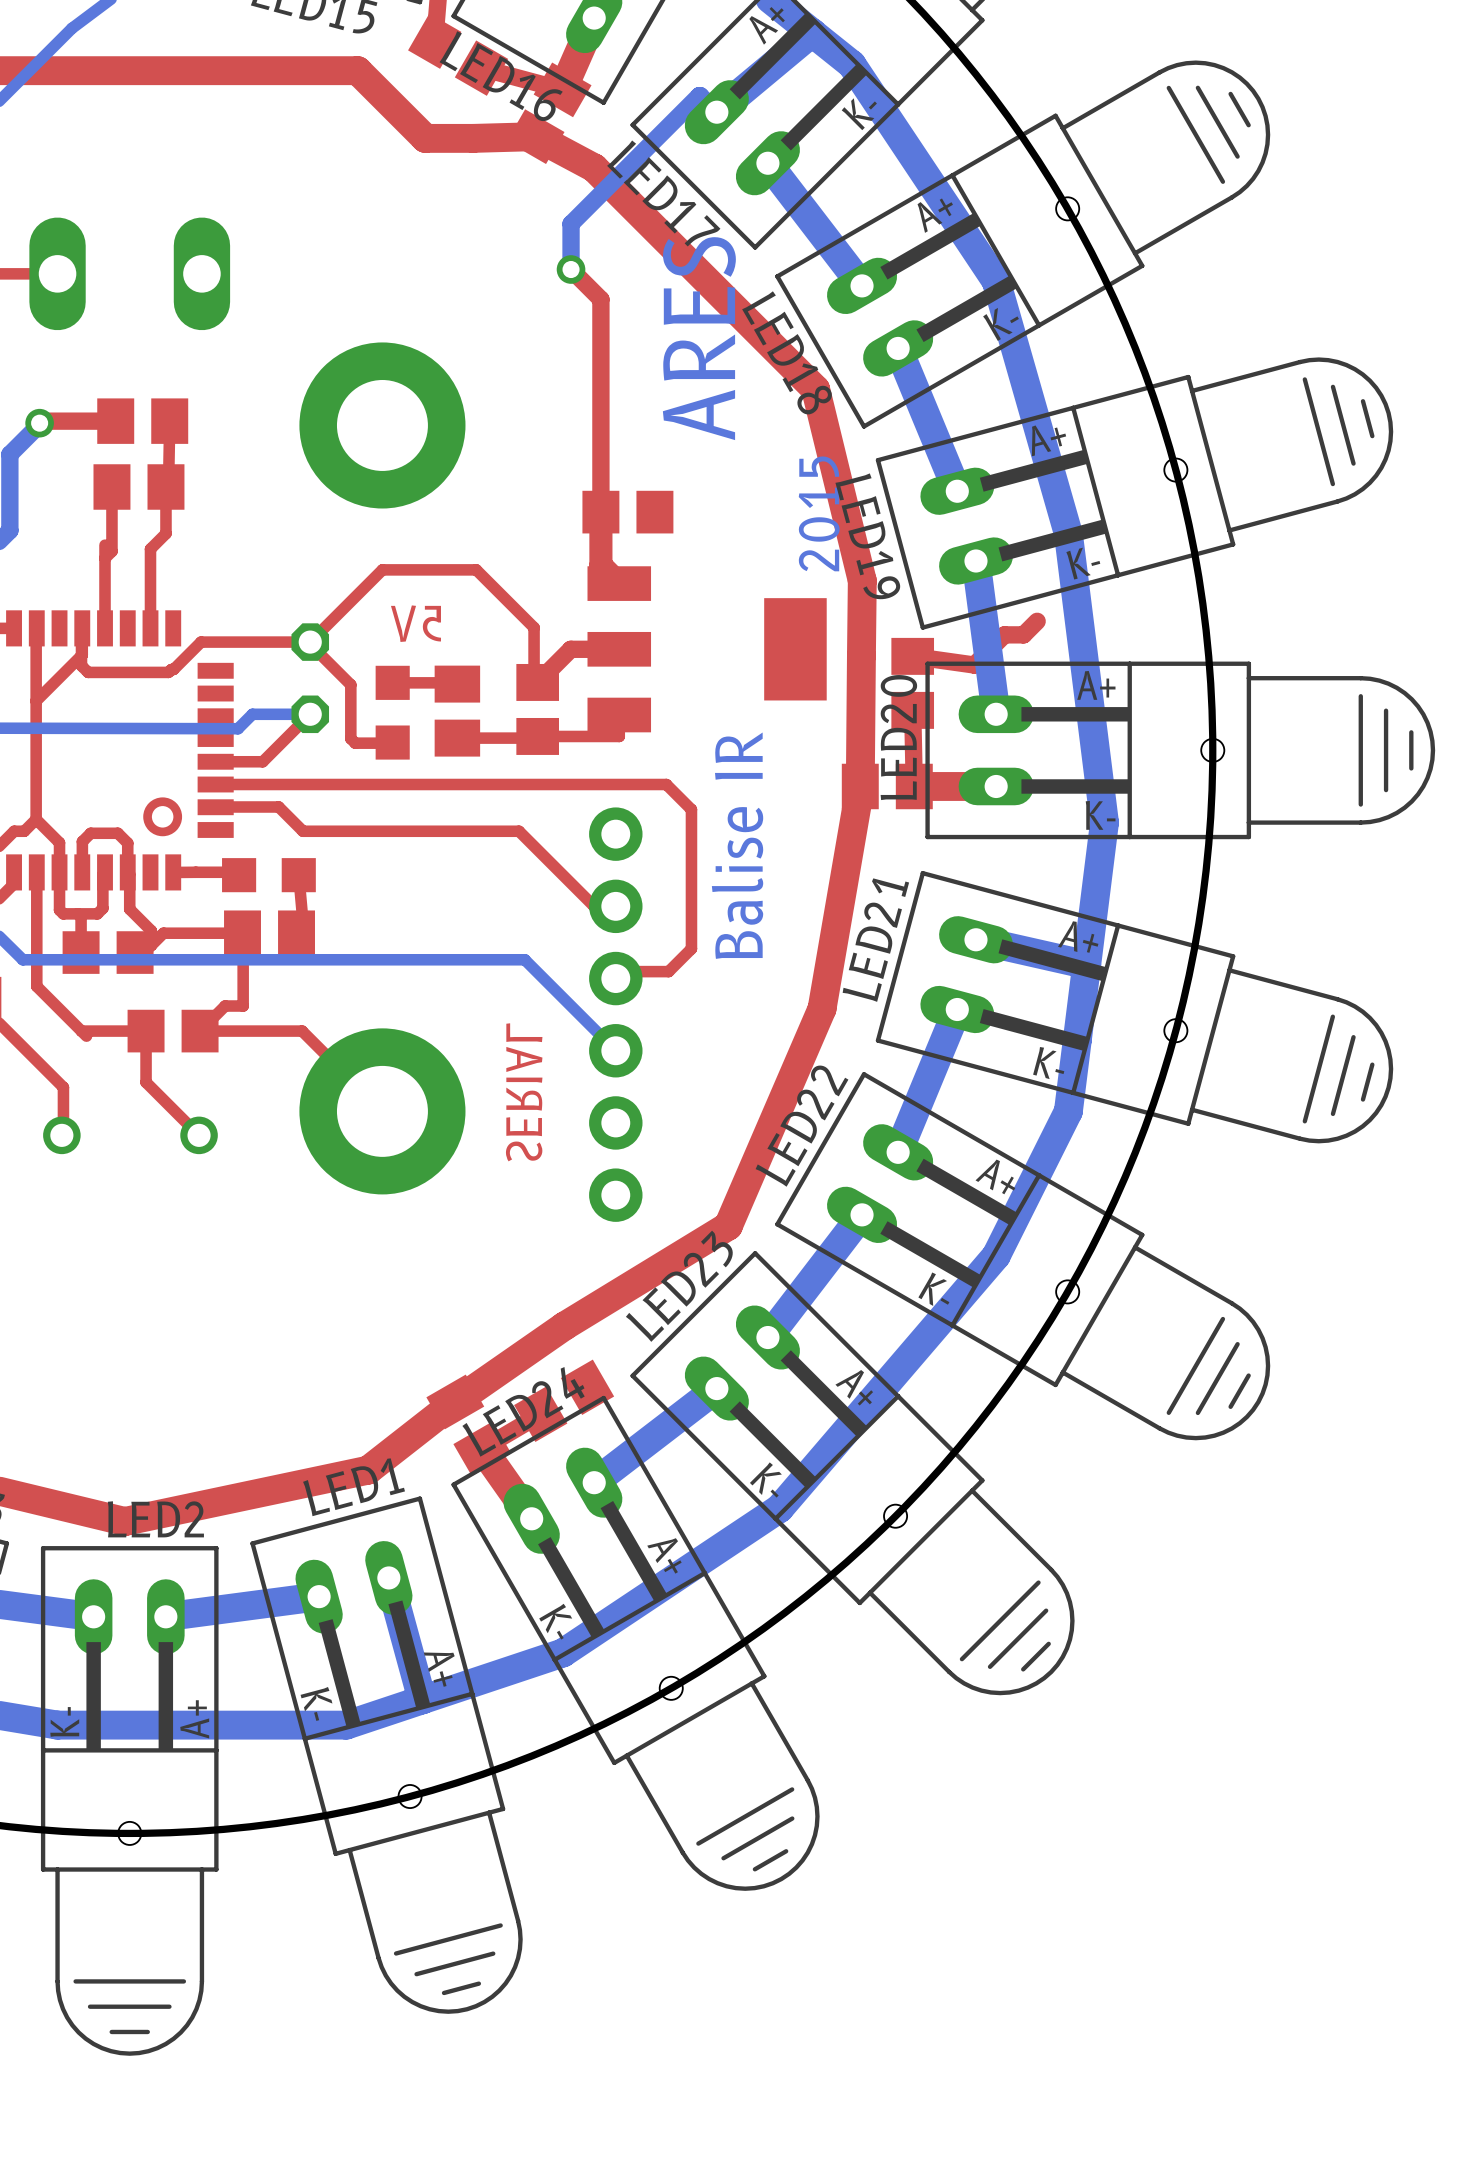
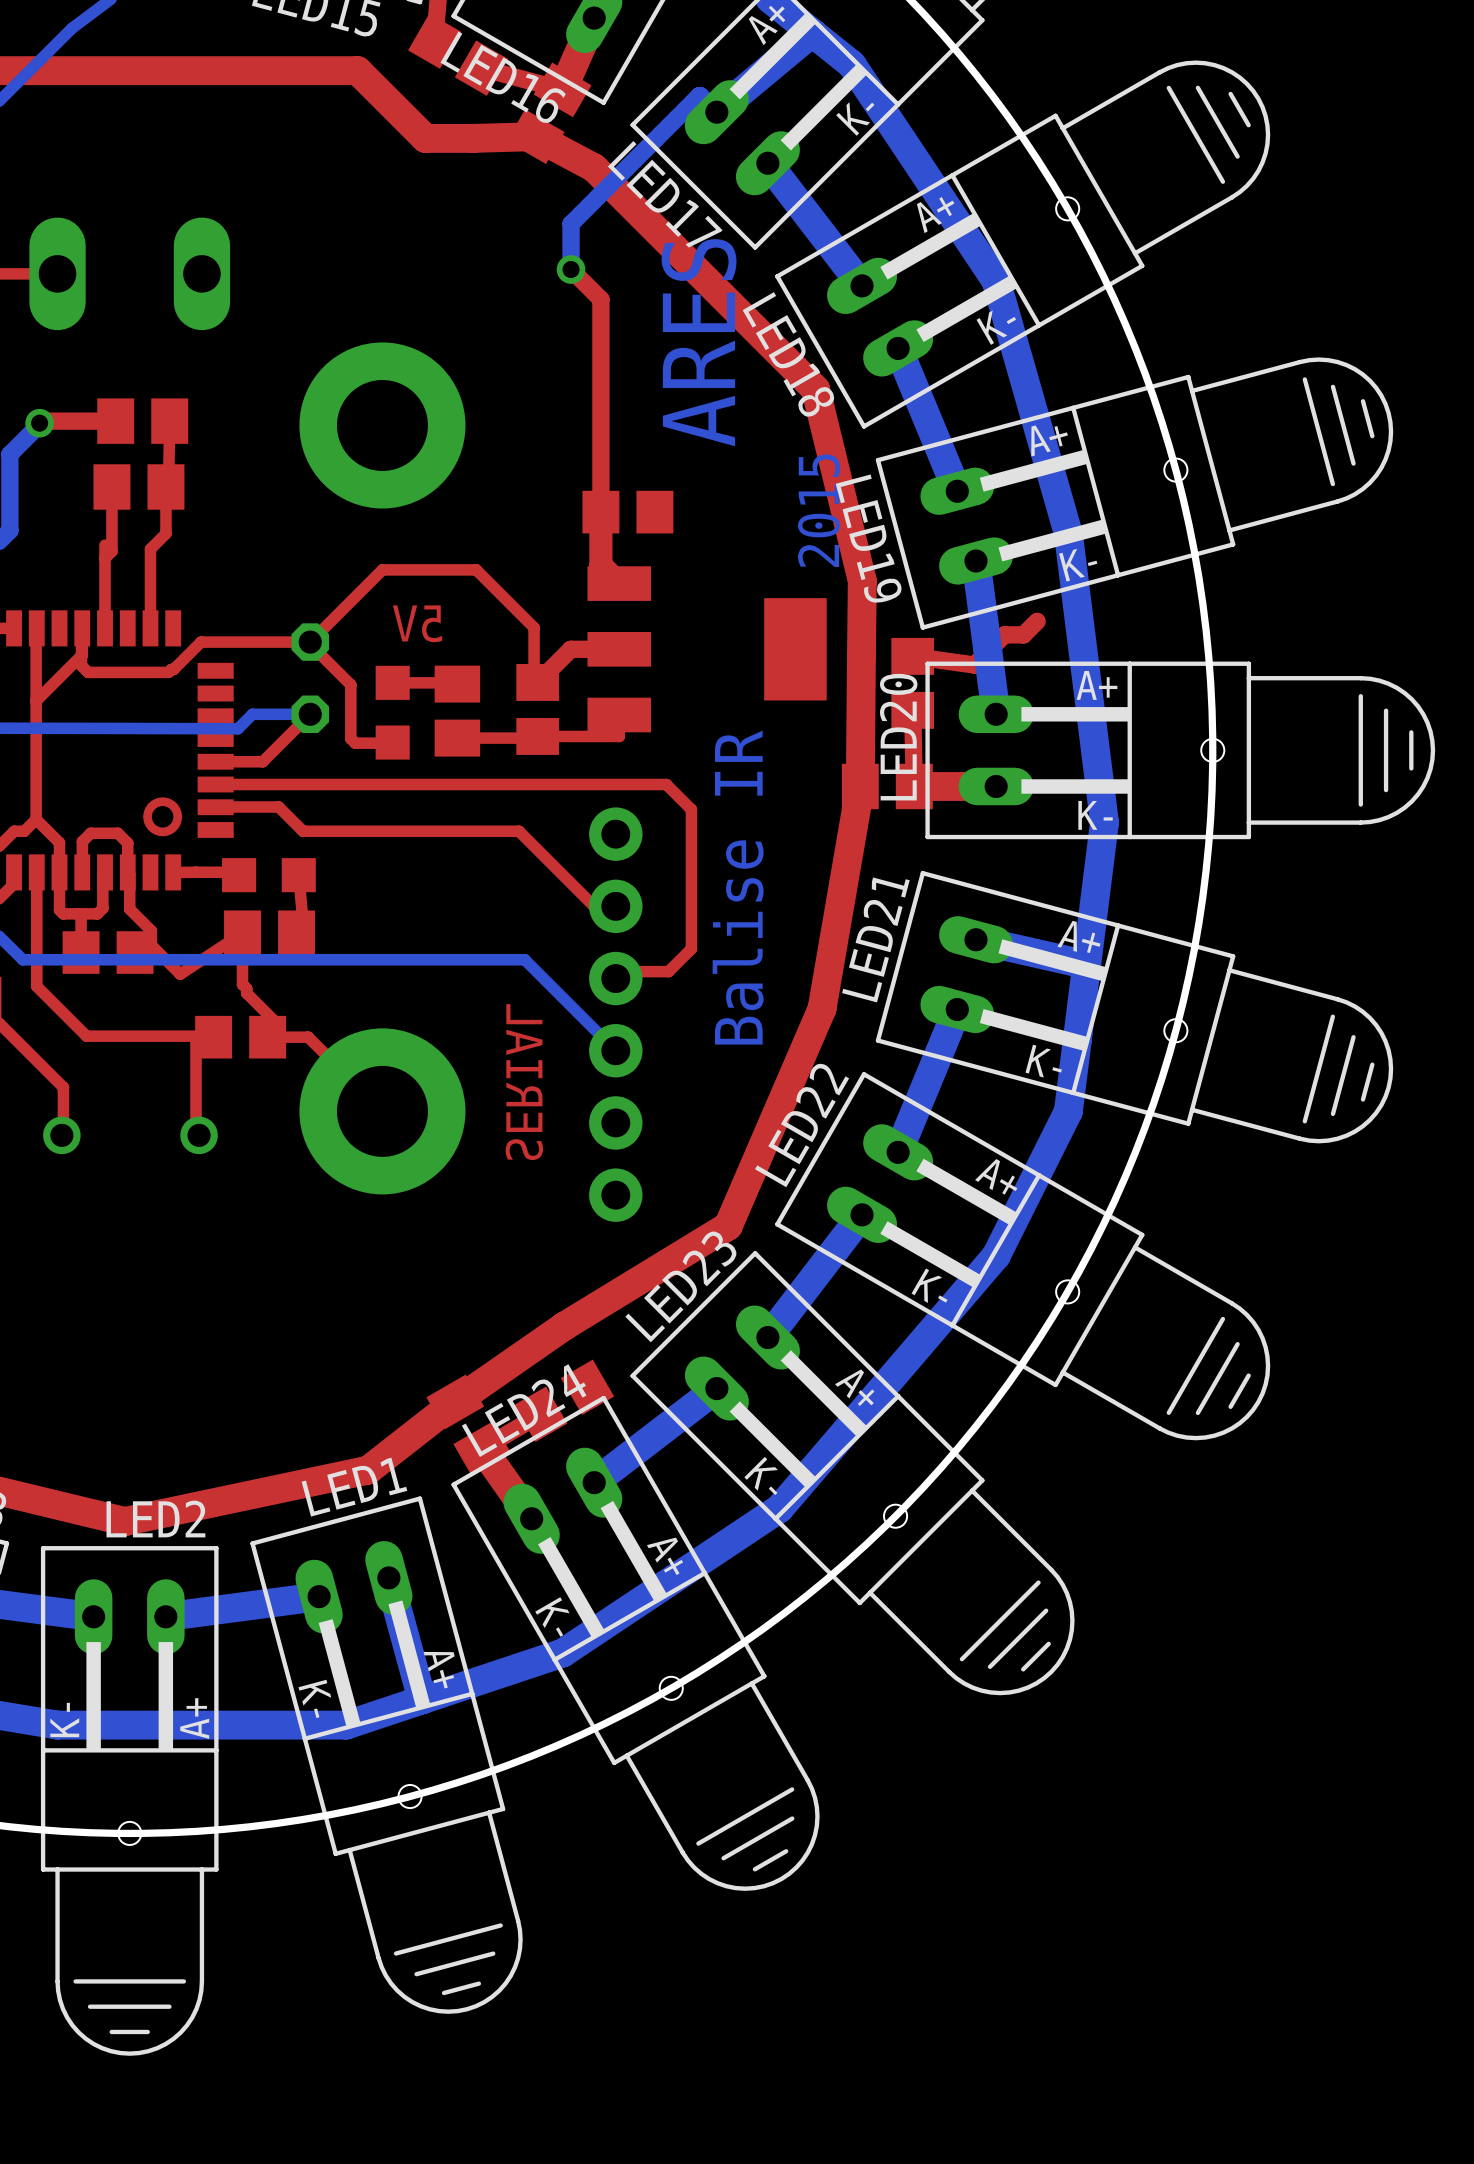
top track: (151, 945) (163, 933) (243, 933) (243, 1006) (225, 1006) (200, 1031) (302, 1031) (308, 1037) -> (151, 945) (180, 974) (242, 933) (242, 984) (246, 988) (246, 993) (274, 1021) (274, 1030) (267, 1037) (308, 1037)
top track: (81, 1031) (146, 1031) (146, 1082) (196, 1132) -> (86, 1036) (212, 1036) (196, 1038) (196, 1132)
part position: (173, 1031) -> (240, 1037)

